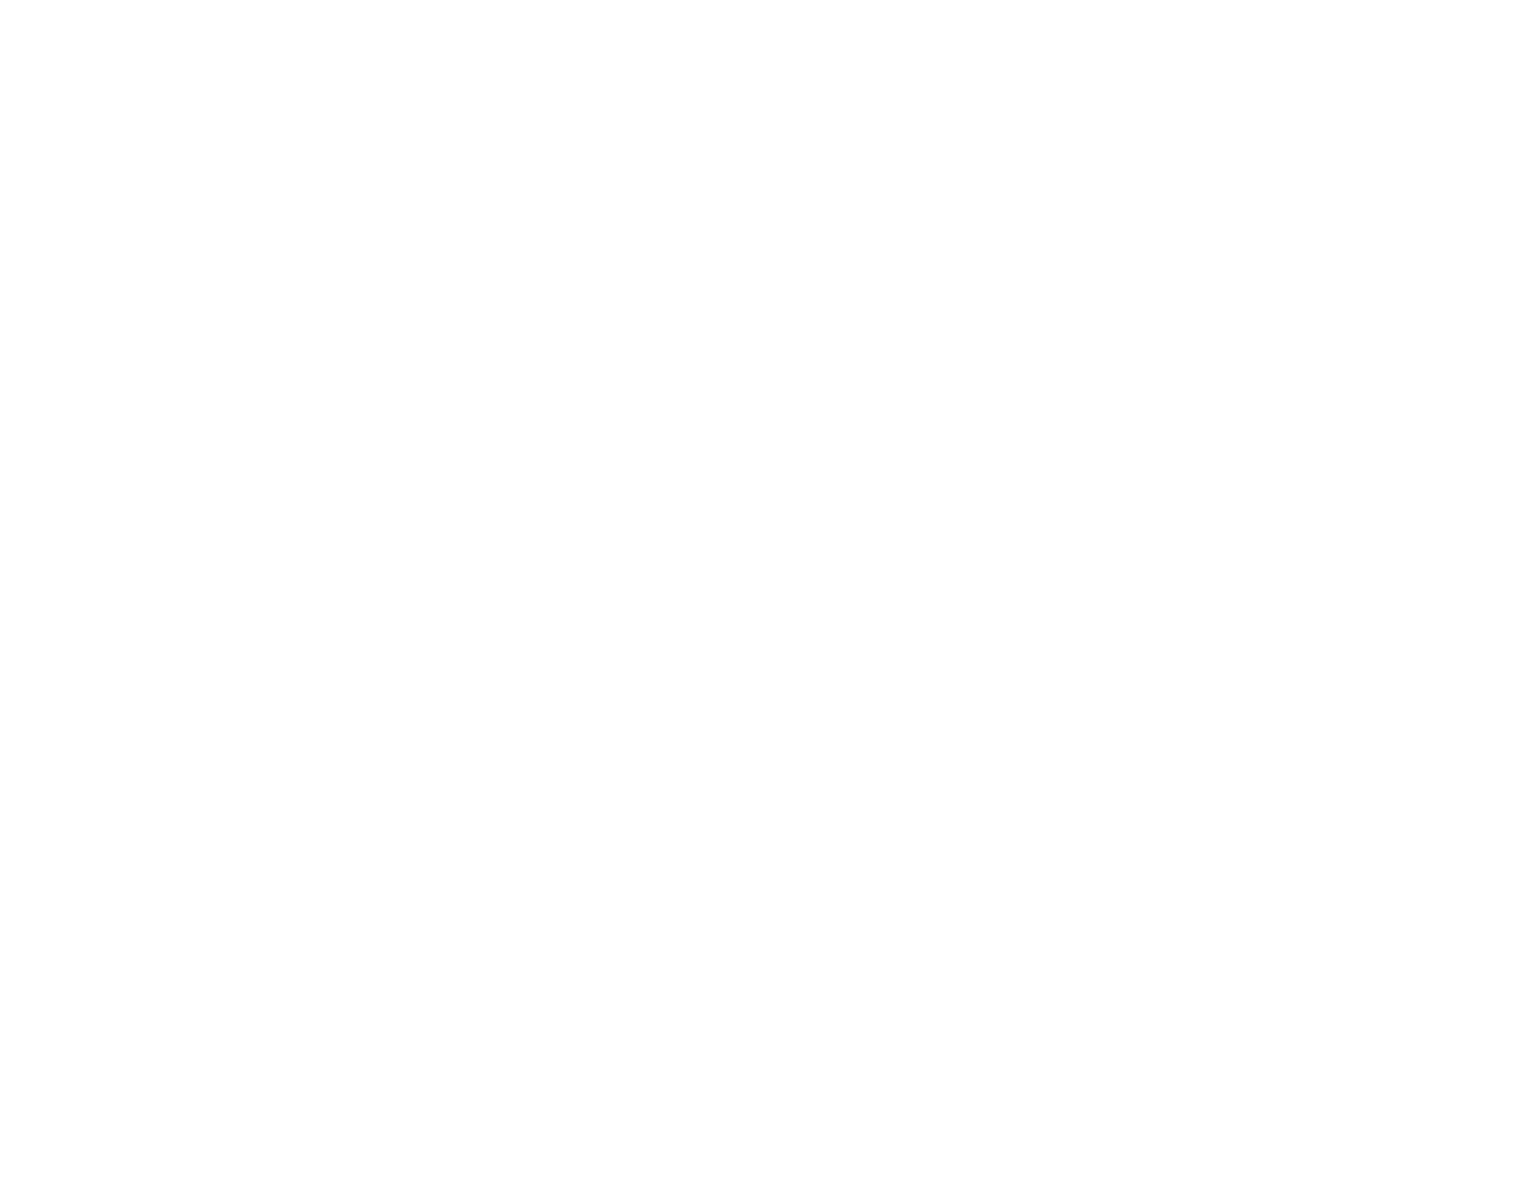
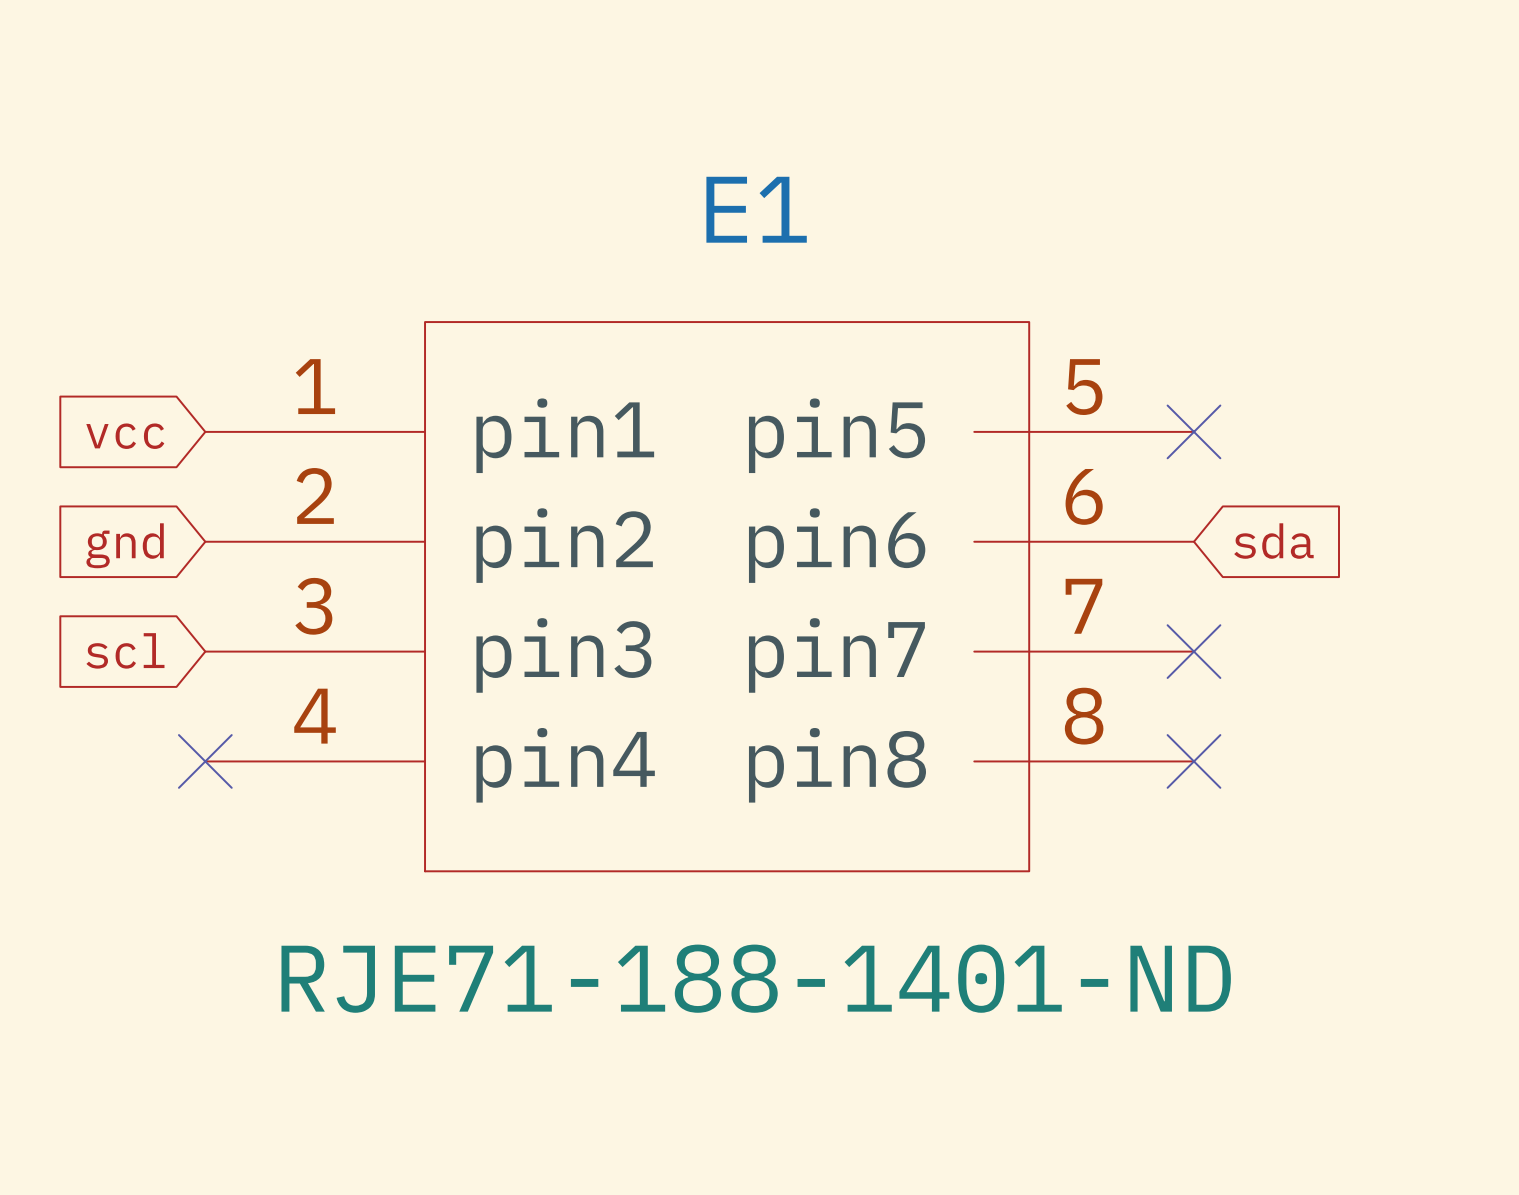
no-connect mark: none -> (1193, 431)
global label: none -> vcc (125, 436)
global label: none -> sda (1273, 541)
global label: none -> gnd (125, 545)
E1: none -> RJE71-188-1401-ND (699, 596)
global label: none -> scl (125, 650)
no-connect mark: none -> (1193, 651)
no-connect mark: none -> (205, 761)
no-connect mark: none -> (1193, 761)

